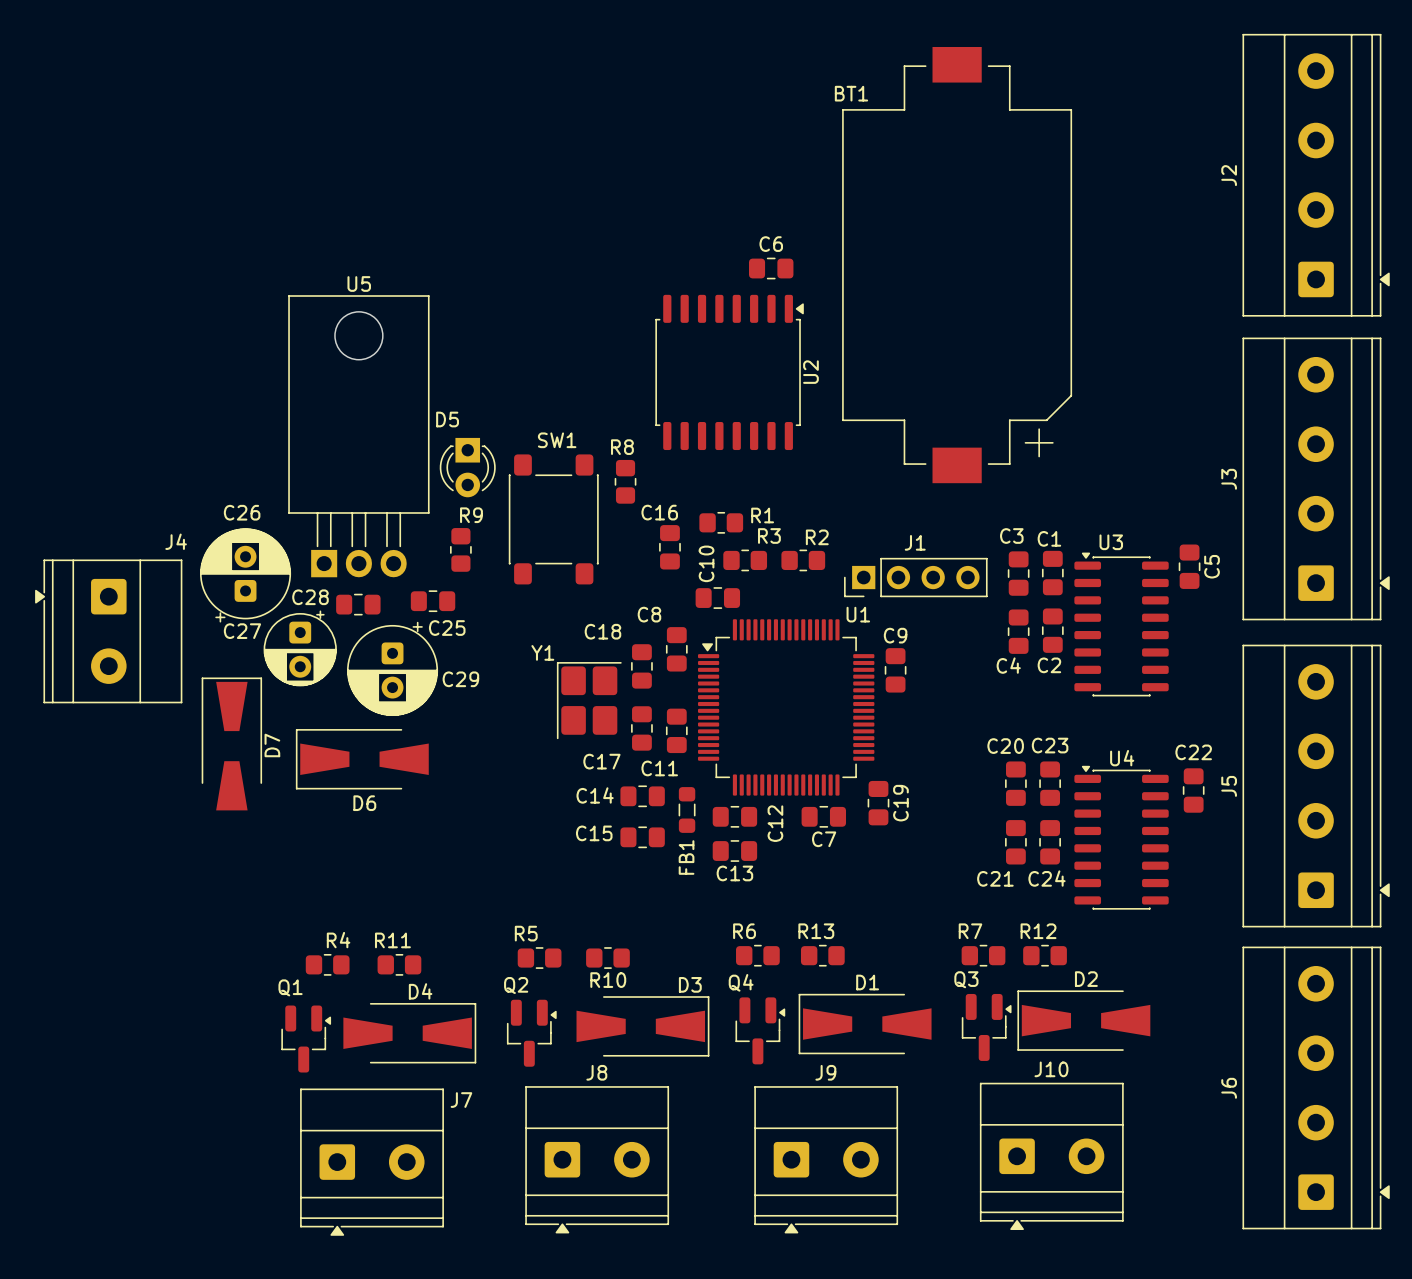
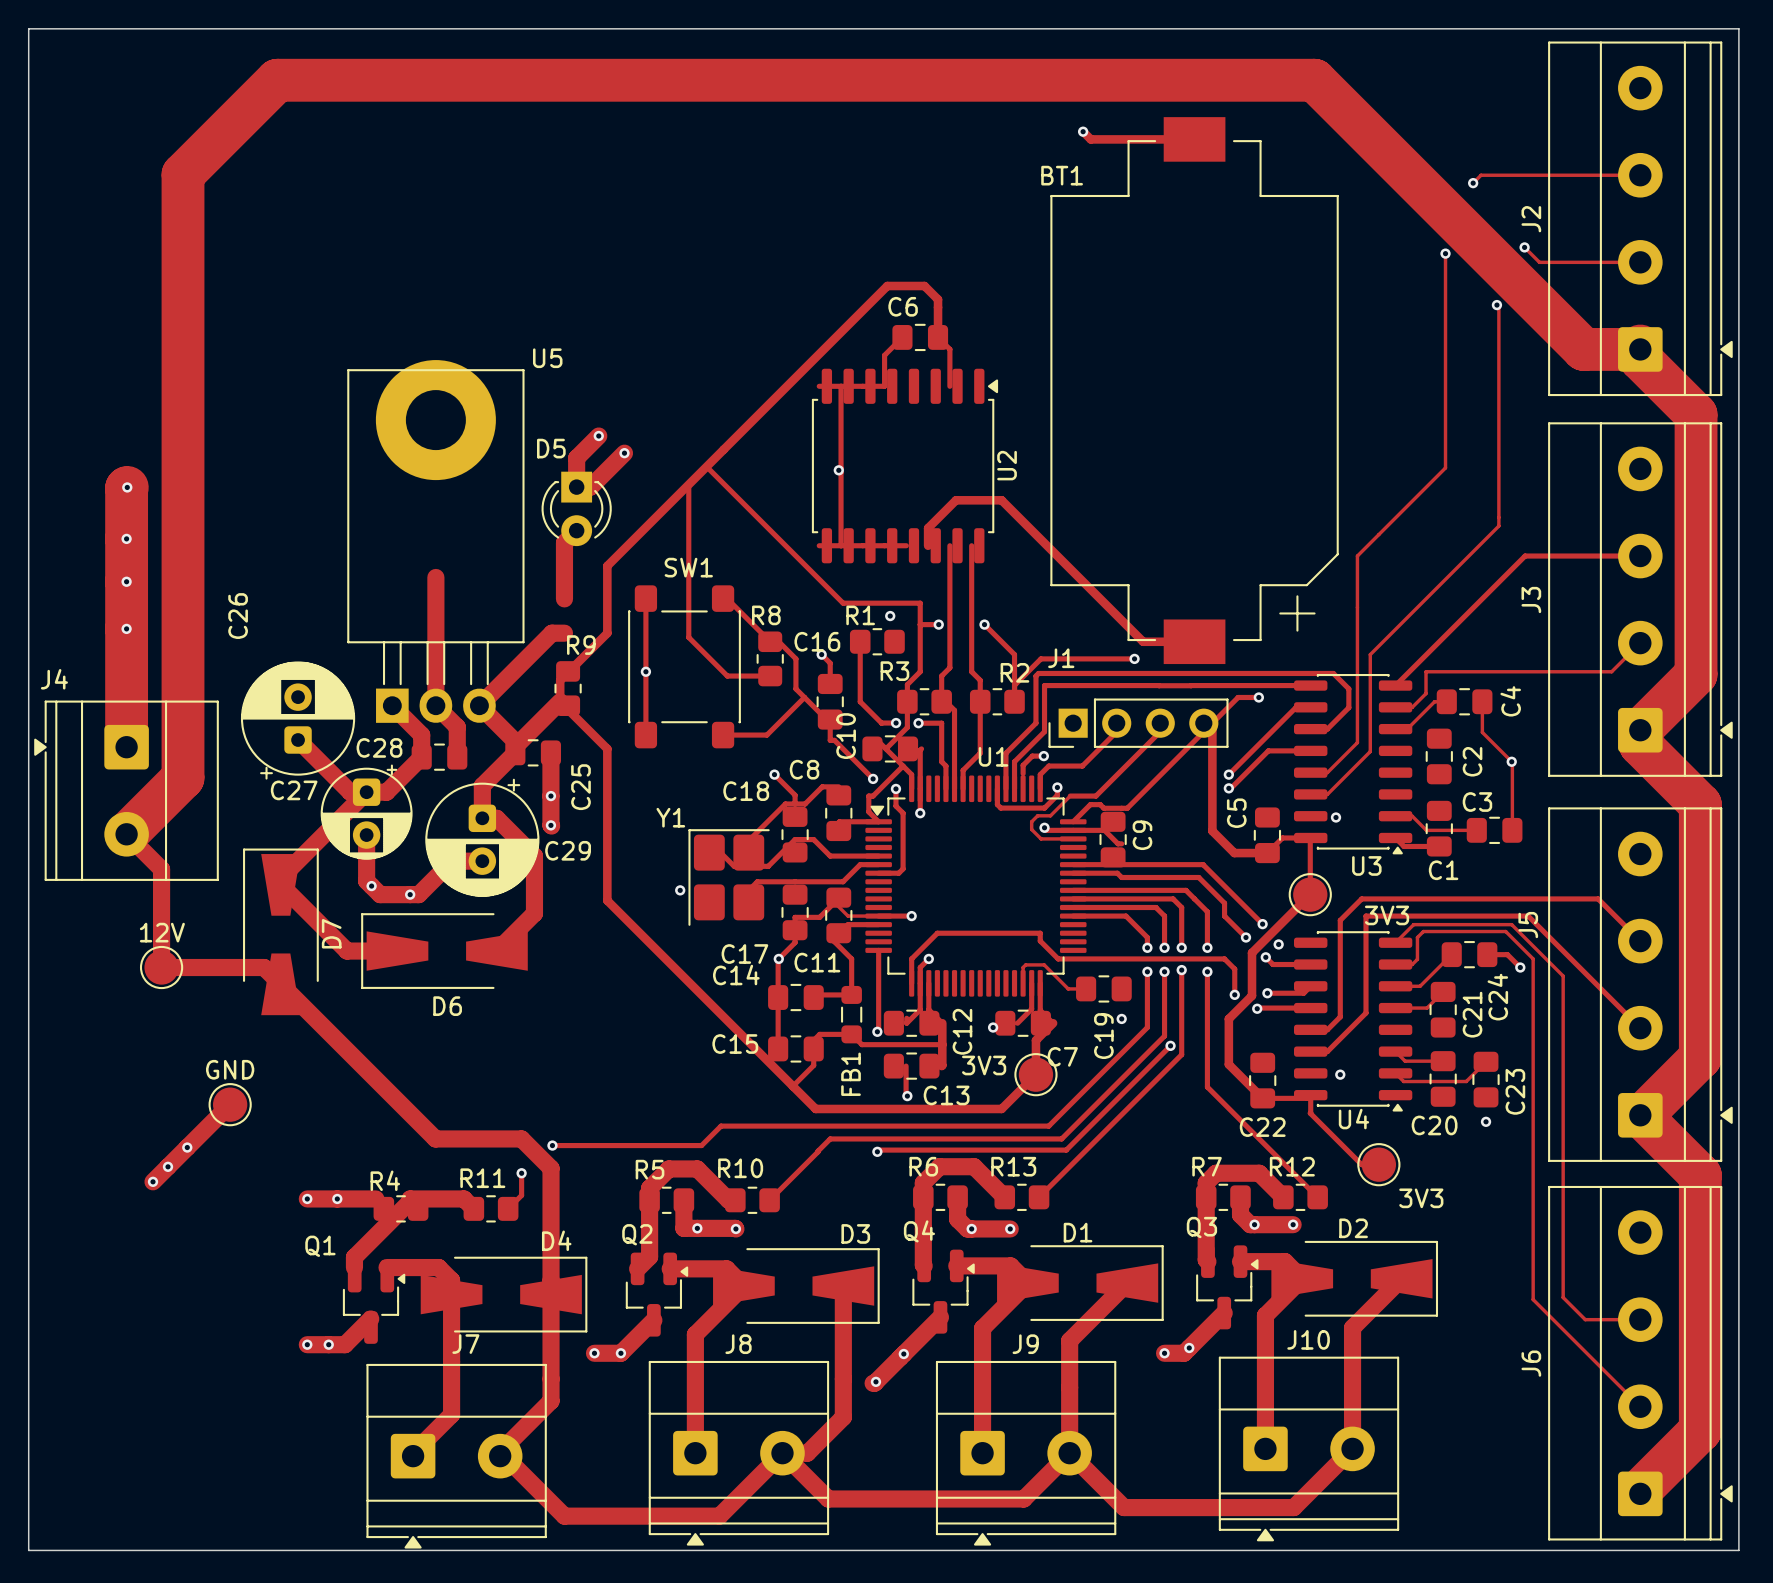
board edge: none -> (28, 28) (1738, 28) (1738, 1550) (28, 1550) (28, 28)
track: none -> (1083, 131) (1090, 139) (1194, 139)
via: none -> (1083, 131)
track: none -> (1640, 175) (1481, 175) (1473, 183)
via: none -> (1473, 183)
track: none -> (1524, 247) (1539, 262) (1640, 262)
via: none -> (1524, 247)
track: none -> (1445, 253) (1445, 467) (1357, 556) (1357, 742) (1327, 772) (1310, 772)
via: none -> (1445, 253)
C6 name position: C6 (771, 244) -> C6 (903, 306)
track: none -> (1496, 305) (1498, 307) (1498, 526) (1370, 654) (1370, 751) (1327, 794) (1310, 794)
via: none -> (1496, 305)
BT1 position: (957, 265) -> (1194, 390)
C6 position: (771, 268) -> (920, 337)
track: none -> (902, 337) (884, 355) (884, 386) (819, 386)
track: none -> (1640, 346) (1640, 358) (1696, 414) (1696, 674) (1640, 730) (1640, 744) (1700, 804) (1700, 1057) (1642, 1115) (1640, 1115) (1700, 1175) (1700, 1430) (1640, 1490) (1640, 1493)
track: none -> (1640, 349) (1583, 349) (1314, 80) (277, 80) (183, 174) (183, 777) (126, 834) (161, 869) (161, 967) (264, 967) (435, 1138) (521, 1138) (551, 1168) (551, 1401) (500, 1451) (564, 1516) (719, 1516) (782, 1453)
U5 name position: U5 (359, 284) -> U5 (547, 358)
U5 footprint: [288, 295, 430, 578] -> [347, 360, 525, 723]
track: none -> (841, 386) (841, 468) (838, 470) (841, 472) (841, 545)
track: none -> (949, 386) (949, 349) (938, 337) (938, 299) (924, 286) (887, 286) (607, 565) (607, 633) (560, 680) (560, 701)
track: none -> (598, 436) (576, 458) (576, 487) (590, 487) (624, 453)
via: none -> (598, 436)
track: none -> (723, 449) (688, 484) (688, 637) (727, 676) (770, 676)
via: none -> (624, 453)
track: none -> (706, 466) (843, 603) (920, 603) (920, 671) (907, 684) (907, 697)
via: none -> (838, 470)
track: none -> (127, 487) (126, 747)
via: none -> (127, 487)
track: none -> (576, 530) (564, 542) (564, 598)
via: none -> (126, 538)
track: none -> (819, 545) (906, 545)
track: none -> (928, 545) (928, 528) (955, 500) (1001, 500) (1143, 641) (1194, 641)
track: none -> (949, 545) (949, 667) (941, 676) (941, 701)
track: none -> (971, 545) (971, 671) (980, 680) (980, 753) (963, 770) (963, 788)
track: none -> (1640, 556) (1525, 556) (1395, 685)
track: none -> (435, 577) (435, 705) (457, 727) (457, 757)
via: none -> (126, 581)
D5 position: (467, 467) -> (576, 508)
track: none -> (645, 598) (645, 735)
track: none -> (723, 598) (727, 598) (770, 641) (778, 641) (795, 658) (795, 688) (826, 719) (830, 719) (830, 740) (834, 740) (873, 778)
R8 position: (625, 481) -> (770, 658)
via: none -> (890, 616)
track: none -> (920, 624) (938, 624)
via: none -> (938, 624)
track: none -> (984, 624) (1014, 654) (1014, 701)
via: none -> (984, 624)
via: none -> (126, 628)
track: none -> (564, 633) (551, 633) (479, 705) (515, 741) (515, 752) (482, 785) (482, 818) (496, 818) (534, 856) (534, 913) (496, 951)
C26 name rotation: 0° (242, 512) -> 90° counterclockwise (238, 616)
C26 name position: C26 (242, 512) -> C26 (238, 616)
track: none -> (860, 641) (860, 701) (881, 723)
track: none -> (1640, 643) (1611, 671) (1426, 671) (1426, 693) (1412, 707) (1395, 707)
R1 name position: R1 (762, 515) -> R1 (860, 615)
SW1 position: (553, 519) -> (684, 666)
track: none -> (821, 654) (830, 663) (830, 683)
via: none -> (821, 654)
R1 position: (721, 522) -> (877, 641)
track: none -> (1134, 658) (1040, 658) (1014, 685)
via: none -> (1134, 658)
via: none -> (645, 671)
R3 name position: R3 (769, 536) -> R3 (894, 671)
C1 name position: C1 (1049, 538) -> C1 (1443, 870)
J4 name position: J4 (176, 541) -> J4 (54, 679)
J1 name position: J1 (915, 542) -> J1 (1061, 658)
C16 position: (669, 547) -> (830, 701)
track: none -> (1310, 685) (1044, 685) (1044, 731) (1014, 761) (1014, 788)
track: none -> (804, 697) (766, 735) (723, 735)
track: none -> (941, 697) (954, 710) (954, 788)
track: none -> (1258, 697) (1238, 697) (1127, 808) (1103, 808) (1100, 804) (1090, 804) (1073, 821)
via: none -> (1258, 697)
track: none -> (560, 701) (607, 748) (607, 900) (815, 1108) (1001, 1108) (1035, 1074) (1035, 1040) (1053, 1023) (1040, 1010) (1040, 983)
track: none -> (560, 701) (515, 746)
track: none -> (907, 701) (907, 727) (885, 748)
track: none -> (1446, 701) (1434, 701) (1407, 729) (1395, 729)
track: none -> (1482, 701) (1482, 732) (1512, 762) (1512, 830)
track: none -> (392, 705) (421, 735) (421, 757) (386, 792) (350, 792) (298, 740)
C10 name position: C10 (706, 563) -> C10 (846, 736)
track: none -> (1310, 707) (1296, 707) (1228, 774)
C5 position: (1189, 566) -> (1267, 835)
C5 name position: C5 (1212, 566) -> C5 (1236, 813)
C3 rotation: 0° (1018, 573) -> 90° clockwise (1494, 830)
C3 position: (1018, 573) -> (1494, 830)
C1 position: (1052, 573) -> (1439, 828)
track: none -> (881, 723) (896, 723)
via: none -> (896, 723)
track: none -> (918, 723) (941, 723) (941, 761) (945, 766) (945, 788)
via: none -> (918, 723)
track: none -> (1125, 723) (1082, 766) (1048, 766) (1040, 774) (1040, 788)
track: none -> (1168, 723) (1095, 796) (1070, 796) (1050, 815) (1037, 815) (1031, 821) (1031, 829) (1041, 838) (1073, 838)
track: none -> (1212, 723) (1212, 831) (1234, 853) (1267, 853) (1282, 837) (1310, 837) (1310, 894) (1252, 952) (1252, 995) (1228, 1018) (1228, 1064) (1262, 1098) (1307, 1098) (1310, 1095) (1310, 1113) (1361, 1164) (1378, 1164)
track: none -> (1310, 729) (1327, 729) (1348, 707) (1348, 688) (1333, 673) (1038, 673) (1035, 676) (1035, 723) (1005, 753) (1005, 788)
track: none -> (878, 740) (911, 774) (911, 788)
track: none -> (921, 748) (920, 813)
track: none -> (1310, 750) (1268, 750) (1228, 788)
track: none -> (550, 752) (551, 826)
track: none -> (1043, 756) (1032, 756) (1023, 765) (1023, 773)
via: none -> (1043, 756)
via: none -> (1511, 761)
track: none -> (903, 766) (873, 796) (868, 796) (868, 811) (878, 821) (838, 822)
U1 name position: U1 (858, 614) -> U1 (993, 756)
track: none -> (774, 774) (795, 795) (795, 803)
via: none -> (774, 774)
via: none -> (1228, 774)
via: none -> (873, 778)
U3 rotation: 0° (1121, 624) -> 180° (1353, 764)
C25 name rotation: 0° (447, 628) -> 90° counterclockwise (580, 787)
track: none -> (838, 786) (822, 786) (805, 803) (785, 803) (748, 840)
track: none -> (1057, 787) (1057, 795) (1044, 808) (1000, 808) (997, 804) (997, 788)
via: none -> (1057, 787)
track: none -> (895, 788) (895, 806) (903, 813) (903, 868) (898, 873) (878, 873)
via: none -> (895, 788)
via: none -> (1228, 788)
C2 position: (1052, 630) -> (1439, 756)
C4 rotation: 0° (1018, 631) -> 90° clockwise (1464, 701)
C4 position: (1018, 631) -> (1464, 701)
track: none -> (366, 792) (280, 877) (280, 884) (347, 951) (397, 951)
via: none -> (550, 796)
C9 name rotation: 0° (895, 635) -> 90° counterclockwise (1142, 835)
C9 name position: C9 (895, 635) -> C9 (1142, 835)
via: none -> (920, 813)
track: none -> (1395, 816) (1412, 816) (1426, 830) (1476, 830)
via: none -> (1336, 817)
via: none -> (550, 825)
track: none -> (1044, 827) (1047, 830) (1104, 830) (1118, 843) (1121, 843)
via: none -> (1044, 827)
C4 name position: C4 (1008, 665) -> C4 (1510, 701)
C2 name rotation: 0° (1049, 665) -> 90° counterclockwise (1472, 761)
C2 name position: C2 (1049, 665) -> C2 (1472, 761)
track: none -> (366, 835) (366, 881) (380, 894) (418, 894) (452, 861) (482, 861)
track: none -> (1395, 837) (1404, 846) (1439, 846)
track: none -> (709, 840) (734, 866) (768, 866) (795, 839) (813, 839) (830, 856) (878, 856)
track: none -> (878, 864) (860, 864) (843, 881) (757, 881) (748, 890)
track: none -> (1073, 864) (1203, 864) (1262, 924)
track: none -> (1073, 873) (1117, 873) (1121, 877) (1198, 877) (1224, 903) (1224, 916) (1245, 937)
via: none -> (371, 886)
via: none -> (680, 890)
track: none -> (1073, 890) (1185, 890) (1207, 911) (1207, 947)
via: none -> (410, 894)
3V3: none -> (1310, 894)
track: none -> (1073, 898) (1173, 898) (1181, 907) (1181, 947)
track: none -> (1073, 907) (1155, 907) (1164, 916) (1164, 947)
track: none -> (911, 916) (848, 916) (834, 902) (819, 917) (795, 917) (795, 942) (778, 959) (778, 1040)
via: none -> (911, 916)
track: none -> (1073, 916) (1125, 916) (1147, 937) (1147, 947)
via: none -> (1262, 924)
track: none -> (878, 924) (848, 924) (834, 938) (834, 941) (851, 958) (851, 994) (816, 994) (813, 997)
C23 name rotation: 0° (1050, 745) -> 90° counterclockwise (1515, 1091)
C23 name position: C23 (1050, 745) -> C23 (1515, 1091)
C20 name position: C20 (1005, 746) -> C20 (1434, 1125)
via: none -> (1245, 937)
track: none -> (1640, 941) (1598, 898) (1361, 898) (1340, 920) (1340, 1016) (1327, 1029) (1310, 1029)
track: none -> (1395, 942) (1413, 924) (1511, 924) (1563, 976) (1563, 1297) (1585, 1319) (1640, 1319)
C22 name position: C22 (1193, 752) -> C22 (1262, 1127)
via: none -> (1278, 944)
via: none -> (1147, 947)
via: none -> (1164, 947)
via: none -> (1181, 947)
via: none -> (1207, 947)
track: none -> (878, 950) (877, 1031)
track: none -> (1451, 954) (1420, 986) (1395, 986)
track: none -> (1487, 954) (1507, 954) (1520, 967)
track: none -> (1265, 957) (1272, 964) (1310, 964)
via: none -> (1265, 957)
via: none -> (778, 958)
track: none -> (928, 958) (920, 967) (920, 1009) (906, 1023) (906, 1018)
via: none -> (928, 958)
track: none -> (1395, 964) (1412, 964) (1417, 959) (1417, 937) (1423, 931) (1505, 931) (1533, 958) (1533, 1299) (1640, 1406)
12V: none -> (161, 967)
via: none -> (1520, 967)
track: none -> (1181, 970) (1181, 1054) (1039, 1197)
via: none -> (1181, 970)
track: none -> (1147, 971) (1147, 1027) (1048, 1126) (721, 1126) (701, 1145) (552, 1145)
via: none -> (1147, 971)
track: none -> (1164, 971) (1164, 1036) (1061, 1138) (830, 1138) (769, 1200)
via: none -> (1164, 971)
track: none -> (1207, 971) (1207, 1087) (1317, 1197)
via: none -> (1207, 971)
C20 position: (1015, 783) -> (1443, 1078)
C23 position: (1050, 783) -> (1486, 1079)
track: none -> (911, 983) (911, 958) (937, 933) (1040, 933) (1040, 941) (1058, 958) (1224, 958) (1234, 969) (1234, 994)
track: none -> (928, 983) (928, 1009) (942, 1023) (941, 1066)
track: none -> (1023, 983) (1023, 967) (1025, 964) (1044, 964) (1068, 988) (1086, 988)
track: none -> (1031, 983) (1031, 1009) (1017, 1023) (997, 1023) (993, 1027)
J5 name position: J5 (1229, 786) -> J5 (1528, 925)
track: none -> (1310, 986) (1303, 993) (1267, 993)
C22 position: (1193, 790) -> (1262, 1080)
track: none -> (1443, 991) (1427, 1008) (1395, 1008)
via: none -> (1267, 993)
via: none -> (1234, 994)
C14 name position: C14 (595, 795) -> C14 (736, 975)
C19 rotation: 0° (878, 803) -> 90° clockwise (1103, 988)
track: none -> (1310, 1008) (1257, 1008)
via: none -> (1257, 1008)
via: none -> (1121, 1018)
via: none -> (993, 1027)
track: none -> (1640, 1028) (1528, 916) (1366, 916) (1366, 1013) (1327, 1051) (1310, 1051)
via: none -> (877, 1031)
track: none -> (942, 1044) (861, 1044) (851, 1034) (819, 1034) (813, 1040) (813, 1065) (792, 1086)
track: none -> (1170, 1045) (1066, 1150) (879, 1150) (877, 1151)
via: none -> (1170, 1045)
U4 rotation: 0° (1121, 837) -> 180° (1353, 1021)
C7 name position: C7 (824, 839) -> C7 (1062, 1056)
track: none -> (1395, 1051) (1405, 1061) (1443, 1061)
C21 position: (1015, 842) -> (1443, 1009)
C24 rotation: 0° (1050, 842) -> 90° clockwise (1469, 954)
C24 position: (1050, 842) -> (1469, 954)
track: none -> (1486, 1061) (1466, 1081) (1403, 1081) (1395, 1073) (1396, 1074)
track: none -> (906, 1066) (907, 1096)
3V3: none -> (1035, 1074)
via: none -> (1340, 1074)
C13 name position: C13 (734, 873) -> C13 (946, 1095)
via: none -> (907, 1096)
C21 name rotation: 0° (995, 878) -> 90° counterclockwise (1472, 1014)
C21 name position: C21 (995, 878) -> C21 (1472, 1014)
track: none -> (230, 1104) (153, 1181)
GND: none -> (230, 1104)
via: none -> (1486, 1121)
via: none -> (552, 1145)
via: none -> (187, 1147)
via: none -> (877, 1151)
3V3: none -> (1378, 1164)
via: none -> (168, 1166)
track: none -> (521, 1173) (521, 1195) (508, 1208)
via: none -> (521, 1173)
R4 name position: R4 (338, 940) -> R4 (385, 1180)
via: none -> (153, 1181)
track: none -> (957, 1197) (957, 1219) (967, 1228) (1010, 1228)
track: none -> (1004, 1197) (974, 1166) (939, 1166) (923, 1183) (924, 1265)
track: none -> (1240, 1197) (1240, 1214) (1250, 1224) (1293, 1224)
track: none -> (1283, 1197) (1259, 1173) (1215, 1173) (1206, 1183) (1206, 1259) (1207, 1261)
track: none -> (307, 1198) (375, 1198)
via: none -> (307, 1198)
via: none -> (337, 1198)
track: none -> (683, 1200) (683, 1228) (735, 1228)
track: none -> (735, 1200) (728, 1200) (697, 1168) (668, 1168) (649, 1188) (649, 1256) (637, 1268)
track: none -> (473, 1208) (463, 1198) (410, 1198) (410, 1201) (354, 1257) (354, 1267)
via: none -> (1254, 1224)
via: none -> (1293, 1224)
via: none -> (697, 1228)
via: none -> (735, 1228)
R10 name position: R10 (608, 980) -> R10 (740, 1168)
via: none -> (971, 1228)
via: none -> (1010, 1228)
Q1 name position: Q1 (290, 987) -> Q1 (320, 1246)
D4 name position: D4 (420, 991) -> D4 (556, 1240)
track: none -> (1240, 1261) (1285, 1261) (1302, 1278) (1265, 1315) (1265, 1448)
track: none -> (956, 1265) (1010, 1265) (1027, 1283) (982, 1328) (982, 1453)
track: none -> (387, 1267) (438, 1267) (451, 1280) (451, 1414) (413, 1451)
track: none -> (670, 1268) (726, 1268) (743, 1286) (695, 1334) (695, 1453)
D2 rotation: 0° (1083, 1020) -> 180° (1354, 1278)
track: none -> (1401, 1278) (1352, 1327) (1352, 1448) (1293, 1507) (1124, 1507) (1069, 1453)
D1 rotation: 0° (865, 1024) -> 180° (1080, 1283)
track: none -> (1127, 1283) (1069, 1340) (1069, 1453)
track: none -> (843, 1286) (843, 1417) (807, 1453) (782, 1453)
track: none -> (1224, 1313) (1184, 1353) (1164, 1353)
track: none -> (940, 1317) (873, 1383)
track: none -> (370, 1318) (345, 1344) (307, 1344)
track: none -> (653, 1320) (620, 1353) (594, 1353)
via: none -> (307, 1344)
via: none -> (328, 1344)
via: none -> (1189, 1348)
via: none -> (594, 1353)
via: none -> (620, 1353)
via: none -> (903, 1354)
via: none -> (1164, 1353)
J7 name position: J7 (461, 1100) -> J7 (465, 1344)
via: none -> (875, 1381)
track: none -> (782, 1453) (828, 1499) (1023, 1499) (1069, 1453)

